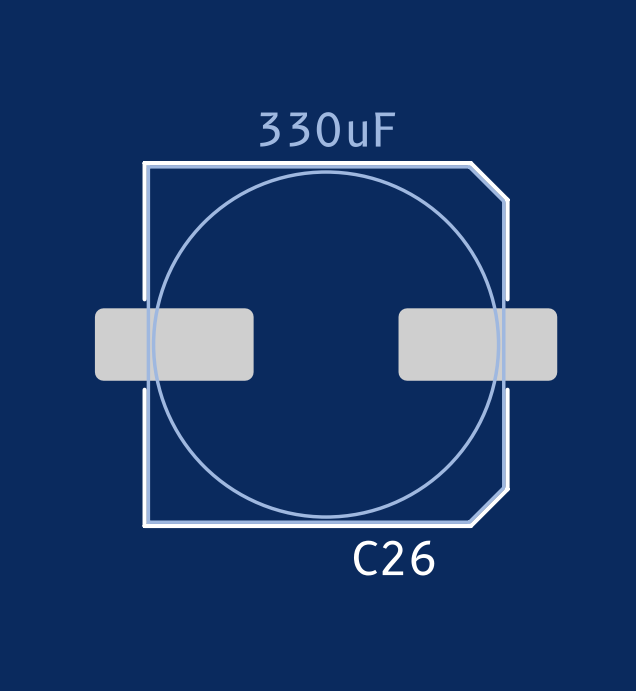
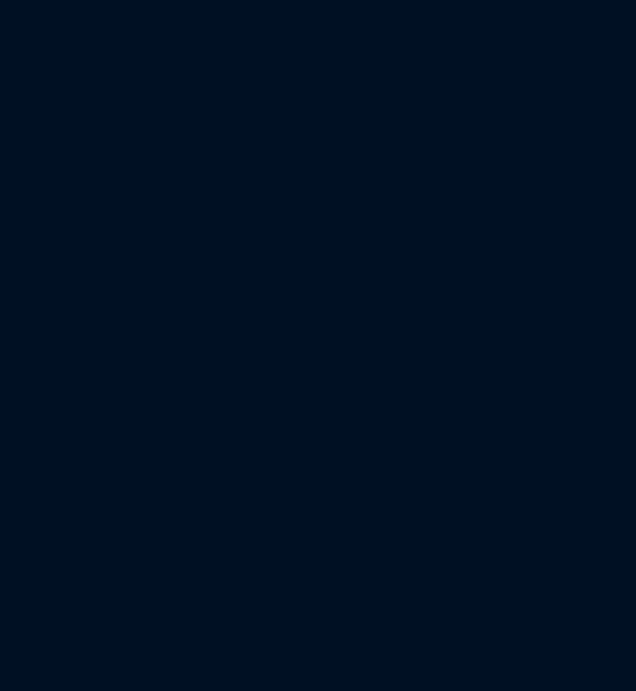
C26: 330uF (326, 344) -> none

